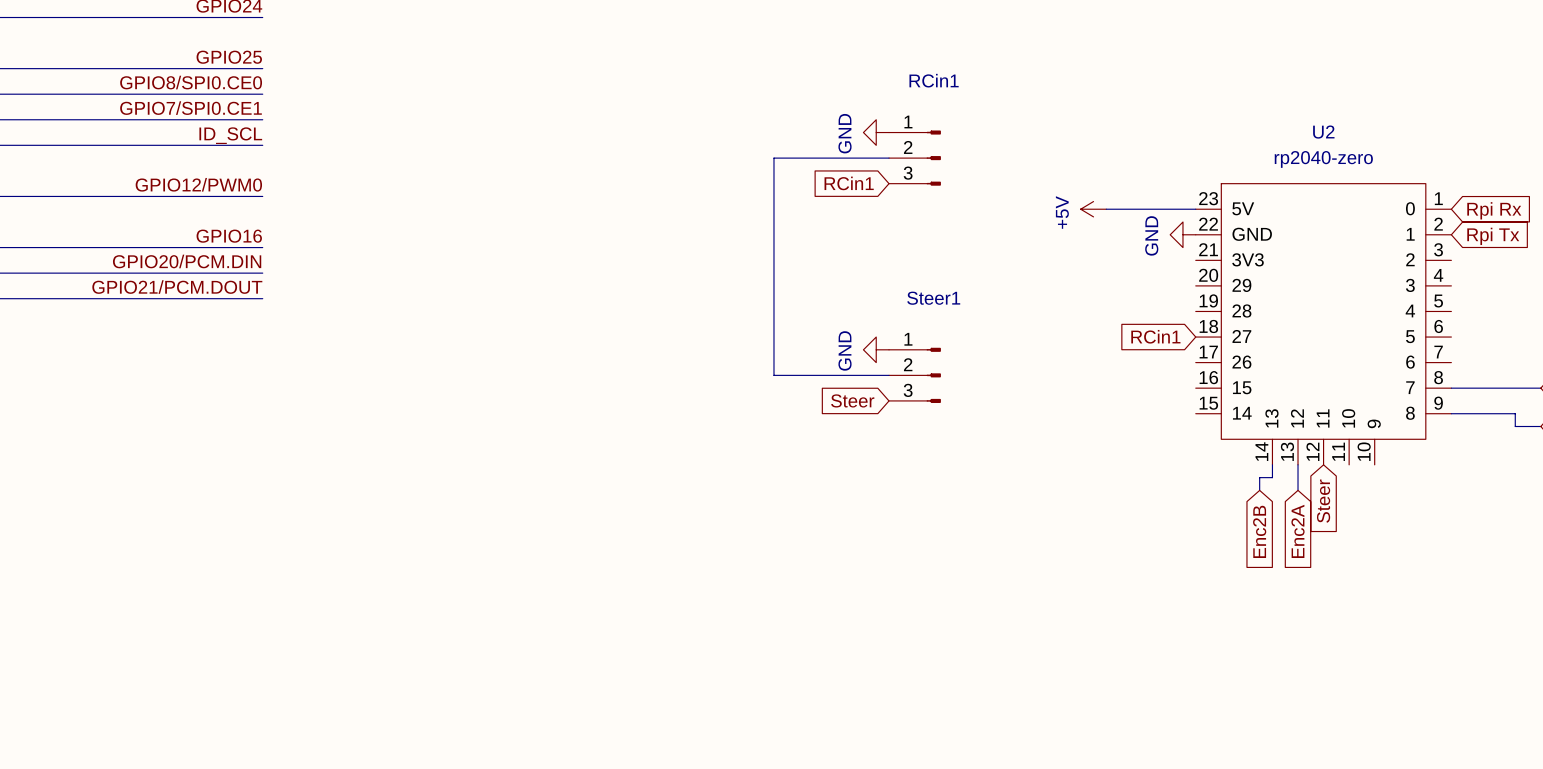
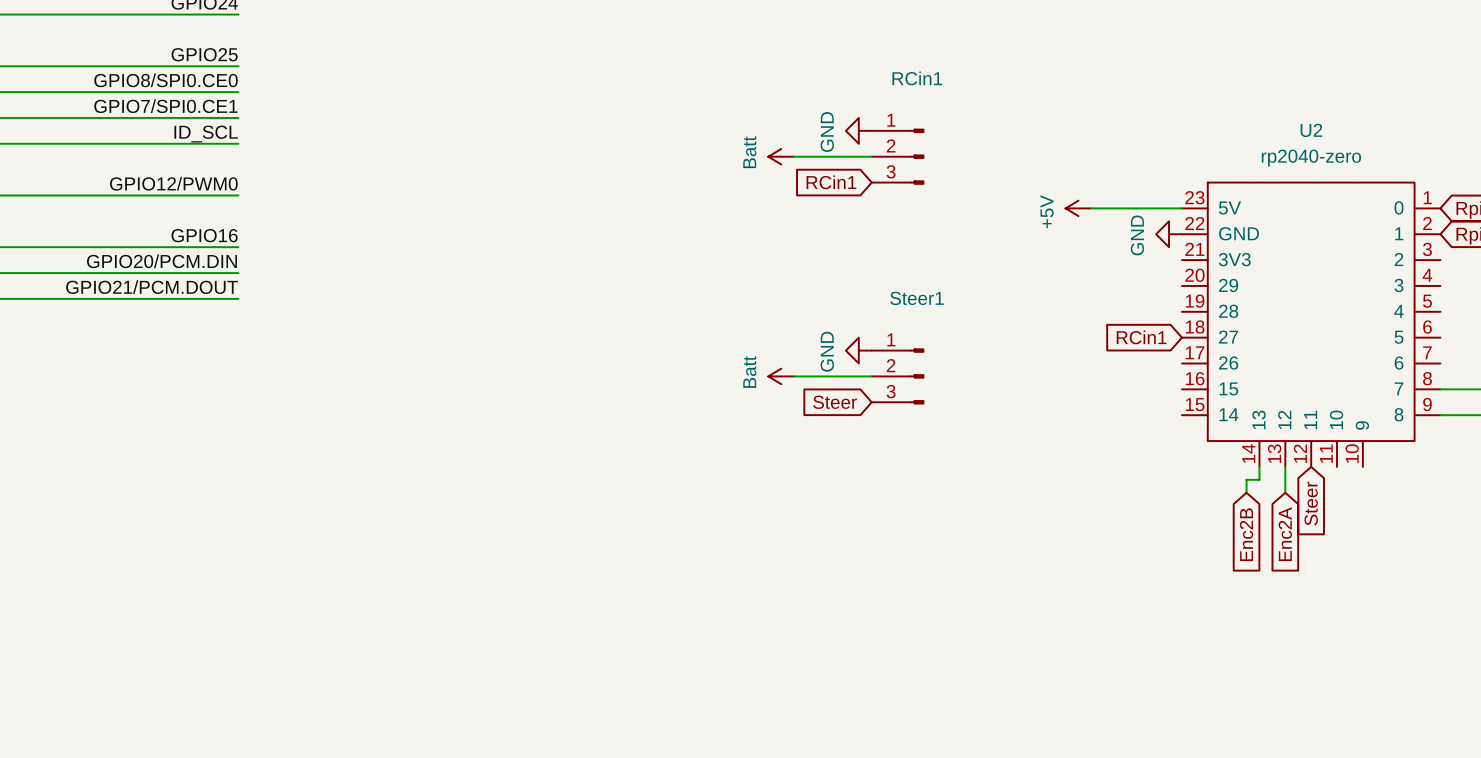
power symbol: none -> Batt (781, 156)
wire: (812, 158) (773, 158) (773, 375) (812, 375) -> none
power symbol: none -> Batt (781, 376)

